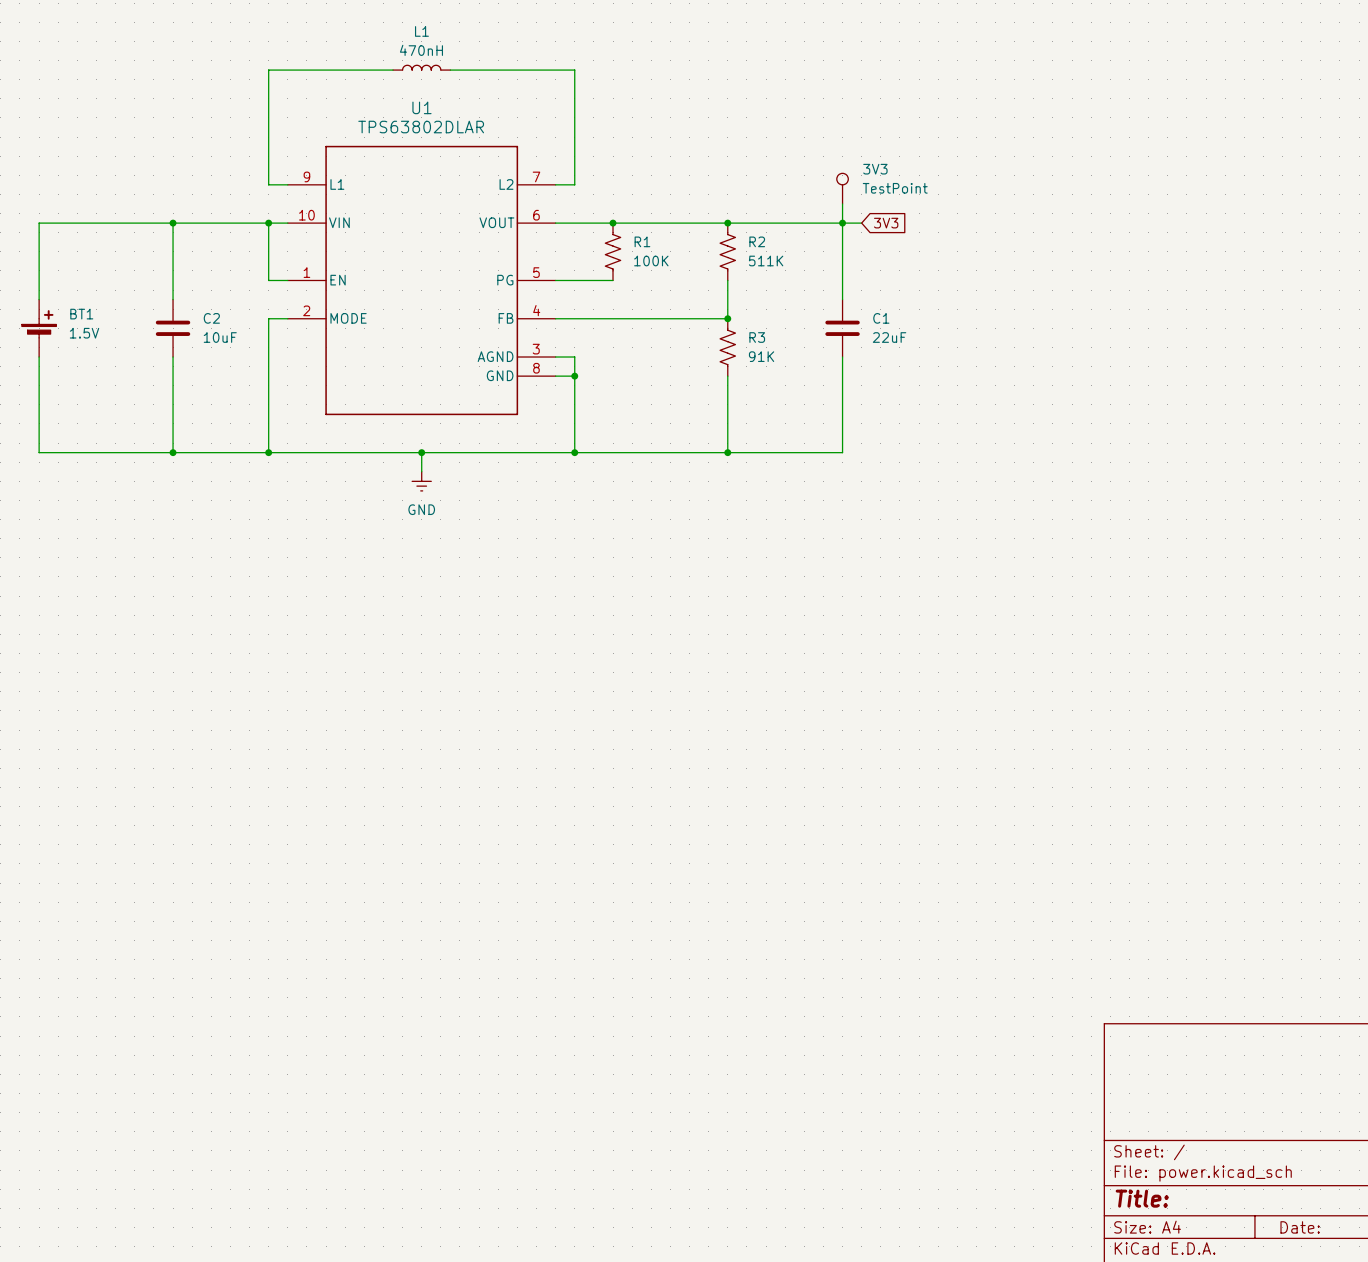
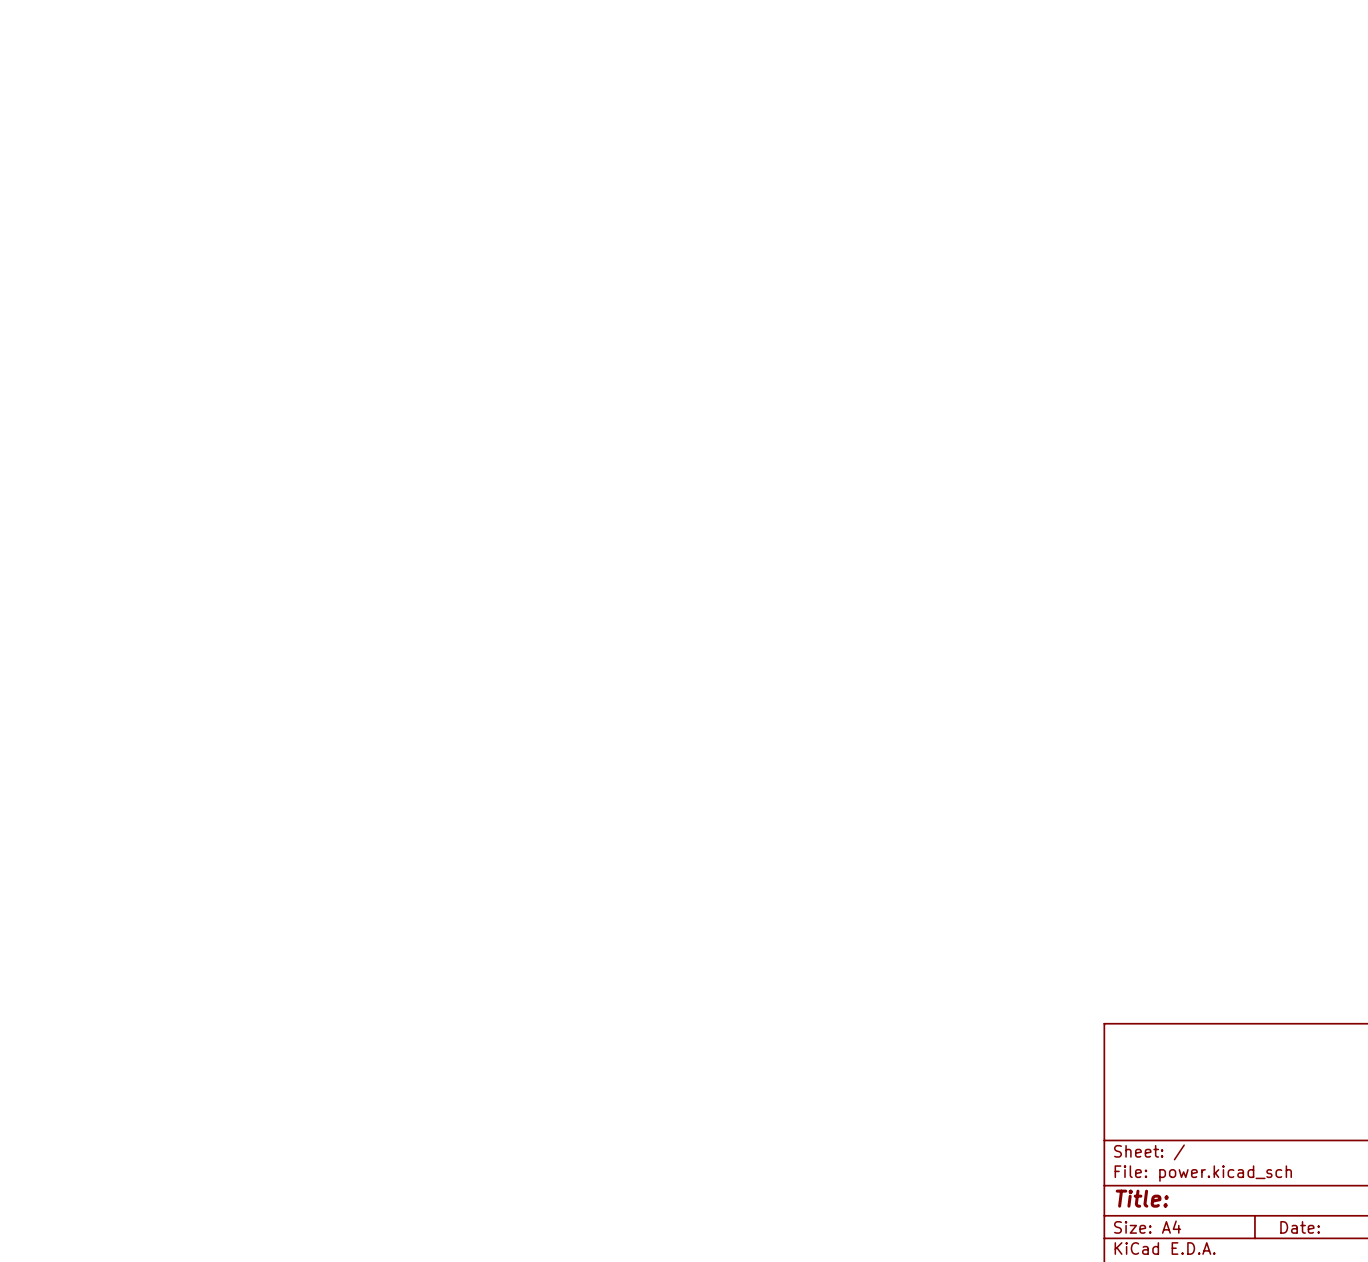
L1: 470nH (421, 67) -> none
wire: (393, 70) (268, 70) (268, 184) (287, 184) -> none
wire: (450, 70) (574, 70) (574, 184) (555, 184) -> none
3V3: TestPoint (842, 188) -> none
wire: (842, 203) (842, 299) -> none
wire: (173, 223) (173, 299) -> none
junction: (173, 223) -> none
wire: (268, 223) (268, 280) (287, 280) -> none
junction: (268, 223) -> none
wire: (287, 223) (39, 223) (39, 299) -> none
wire: (555, 223) (861, 223) -> none
junction: (613, 223) -> none
junction: (727, 223) -> none
junction: (842, 223) -> none
global label: 3V3 (886, 223) -> none
R1: 100K (613, 251) -> none
R2: 511K (727, 251) -> none
U1: TPS63802DLAR (421, 280) -> none
wire: (555, 280) (613, 280) -> none
wire: (727, 280) (727, 318) (555, 318) -> none
wire: (287, 318) (268, 318) (268, 452) -> none
junction: (727, 318) -> none
BT1: 1.5V (39, 328) -> none
C2: 10uF (173, 328) -> none
C1: 22uF (842, 328) -> none
R3: 91K (727, 347) -> none
wire: (39, 357) (39, 452) (842, 452) (842, 357) -> none
wire: (173, 357) (173, 452) -> none
wire: (555, 357) (574, 357) (574, 452) -> none
wire: (555, 376) (574, 376) -> none
junction: (574, 376) -> none
wire: (727, 376) (727, 452) -> none
junction: (173, 452) -> none
junction: (268, 452) -> none
wire: (421, 452) (421, 471) -> none
junction: (421, 452) -> none
junction: (574, 452) -> none
junction: (727, 452) -> none
power symbol: GND (421, 481) -> none

